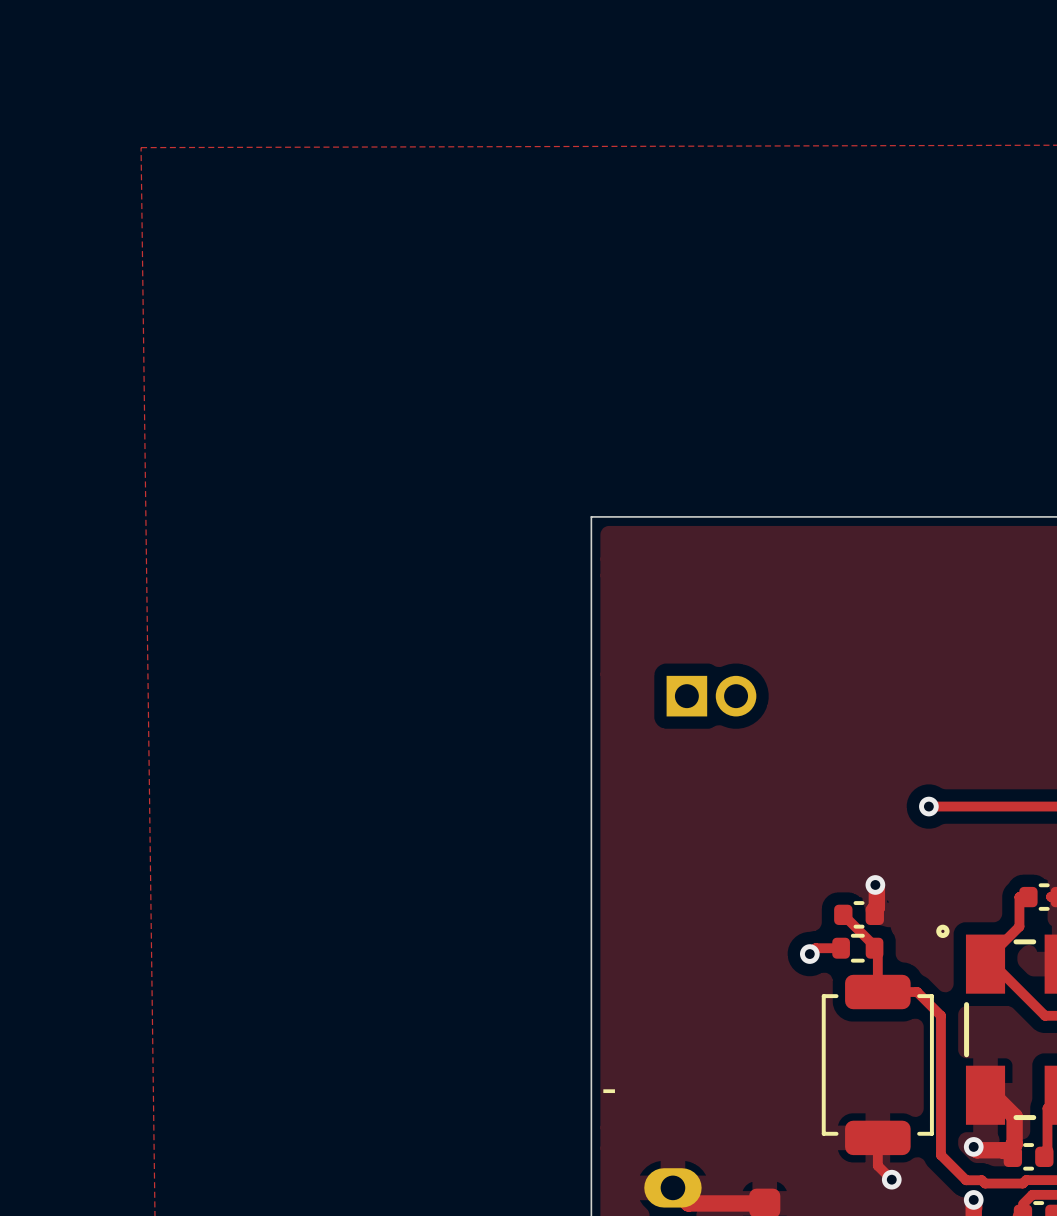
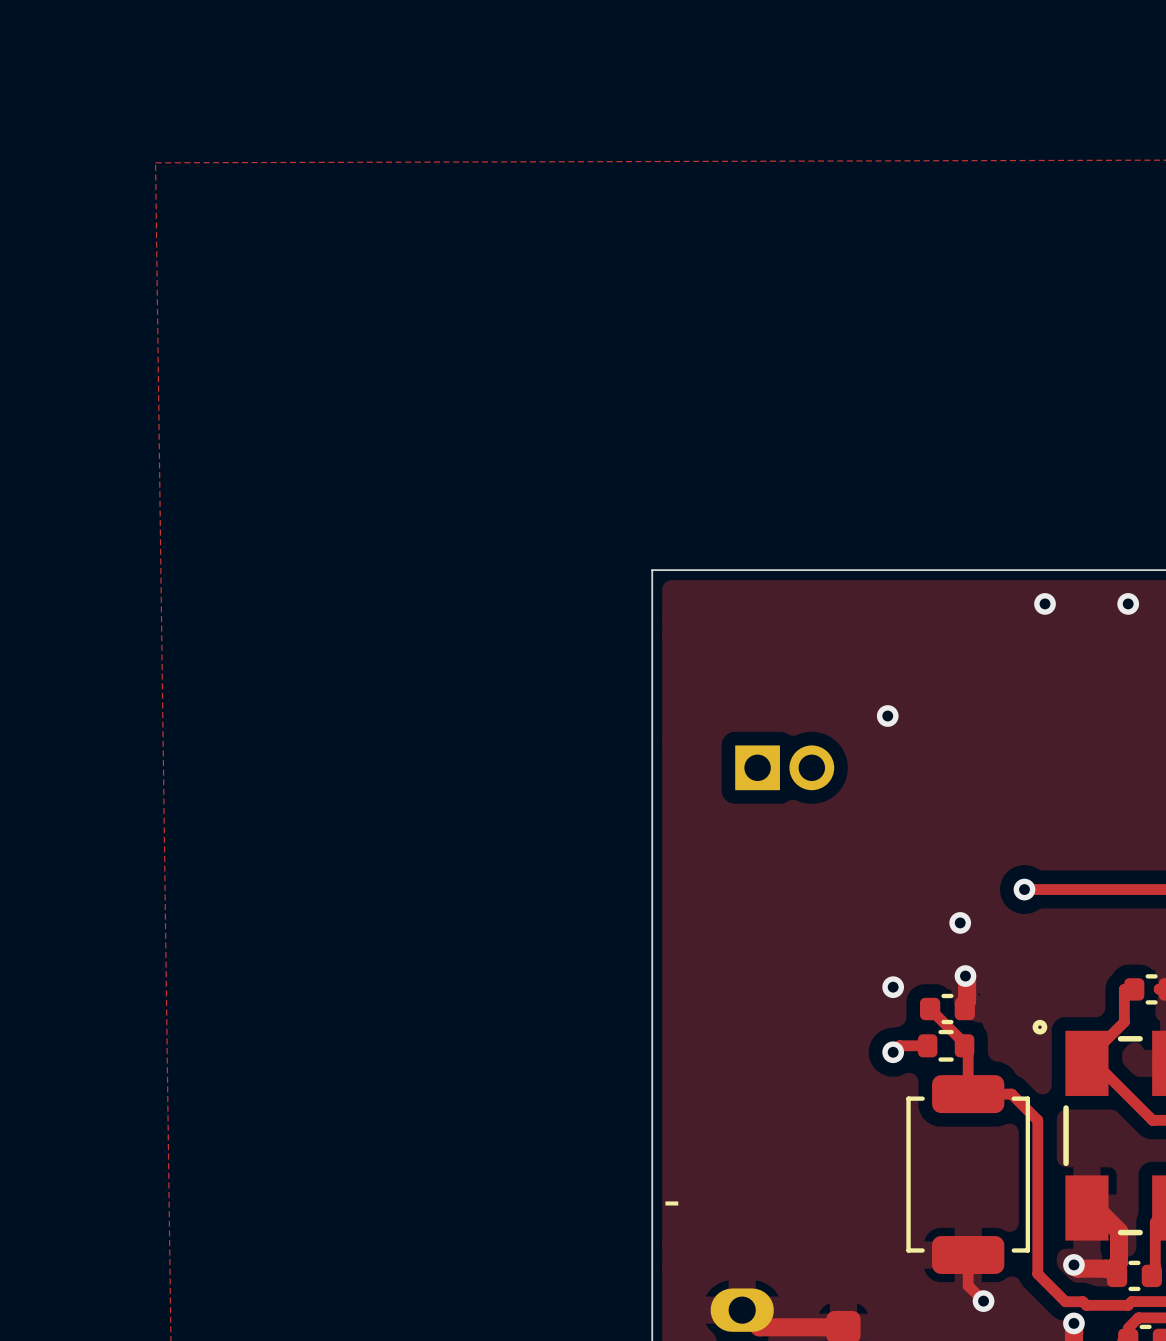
via: none -> (1045, 603)
via: none -> (1128, 603)
via: none -> (887, 716)
via: none -> (960, 922)
via: none -> (893, 987)

